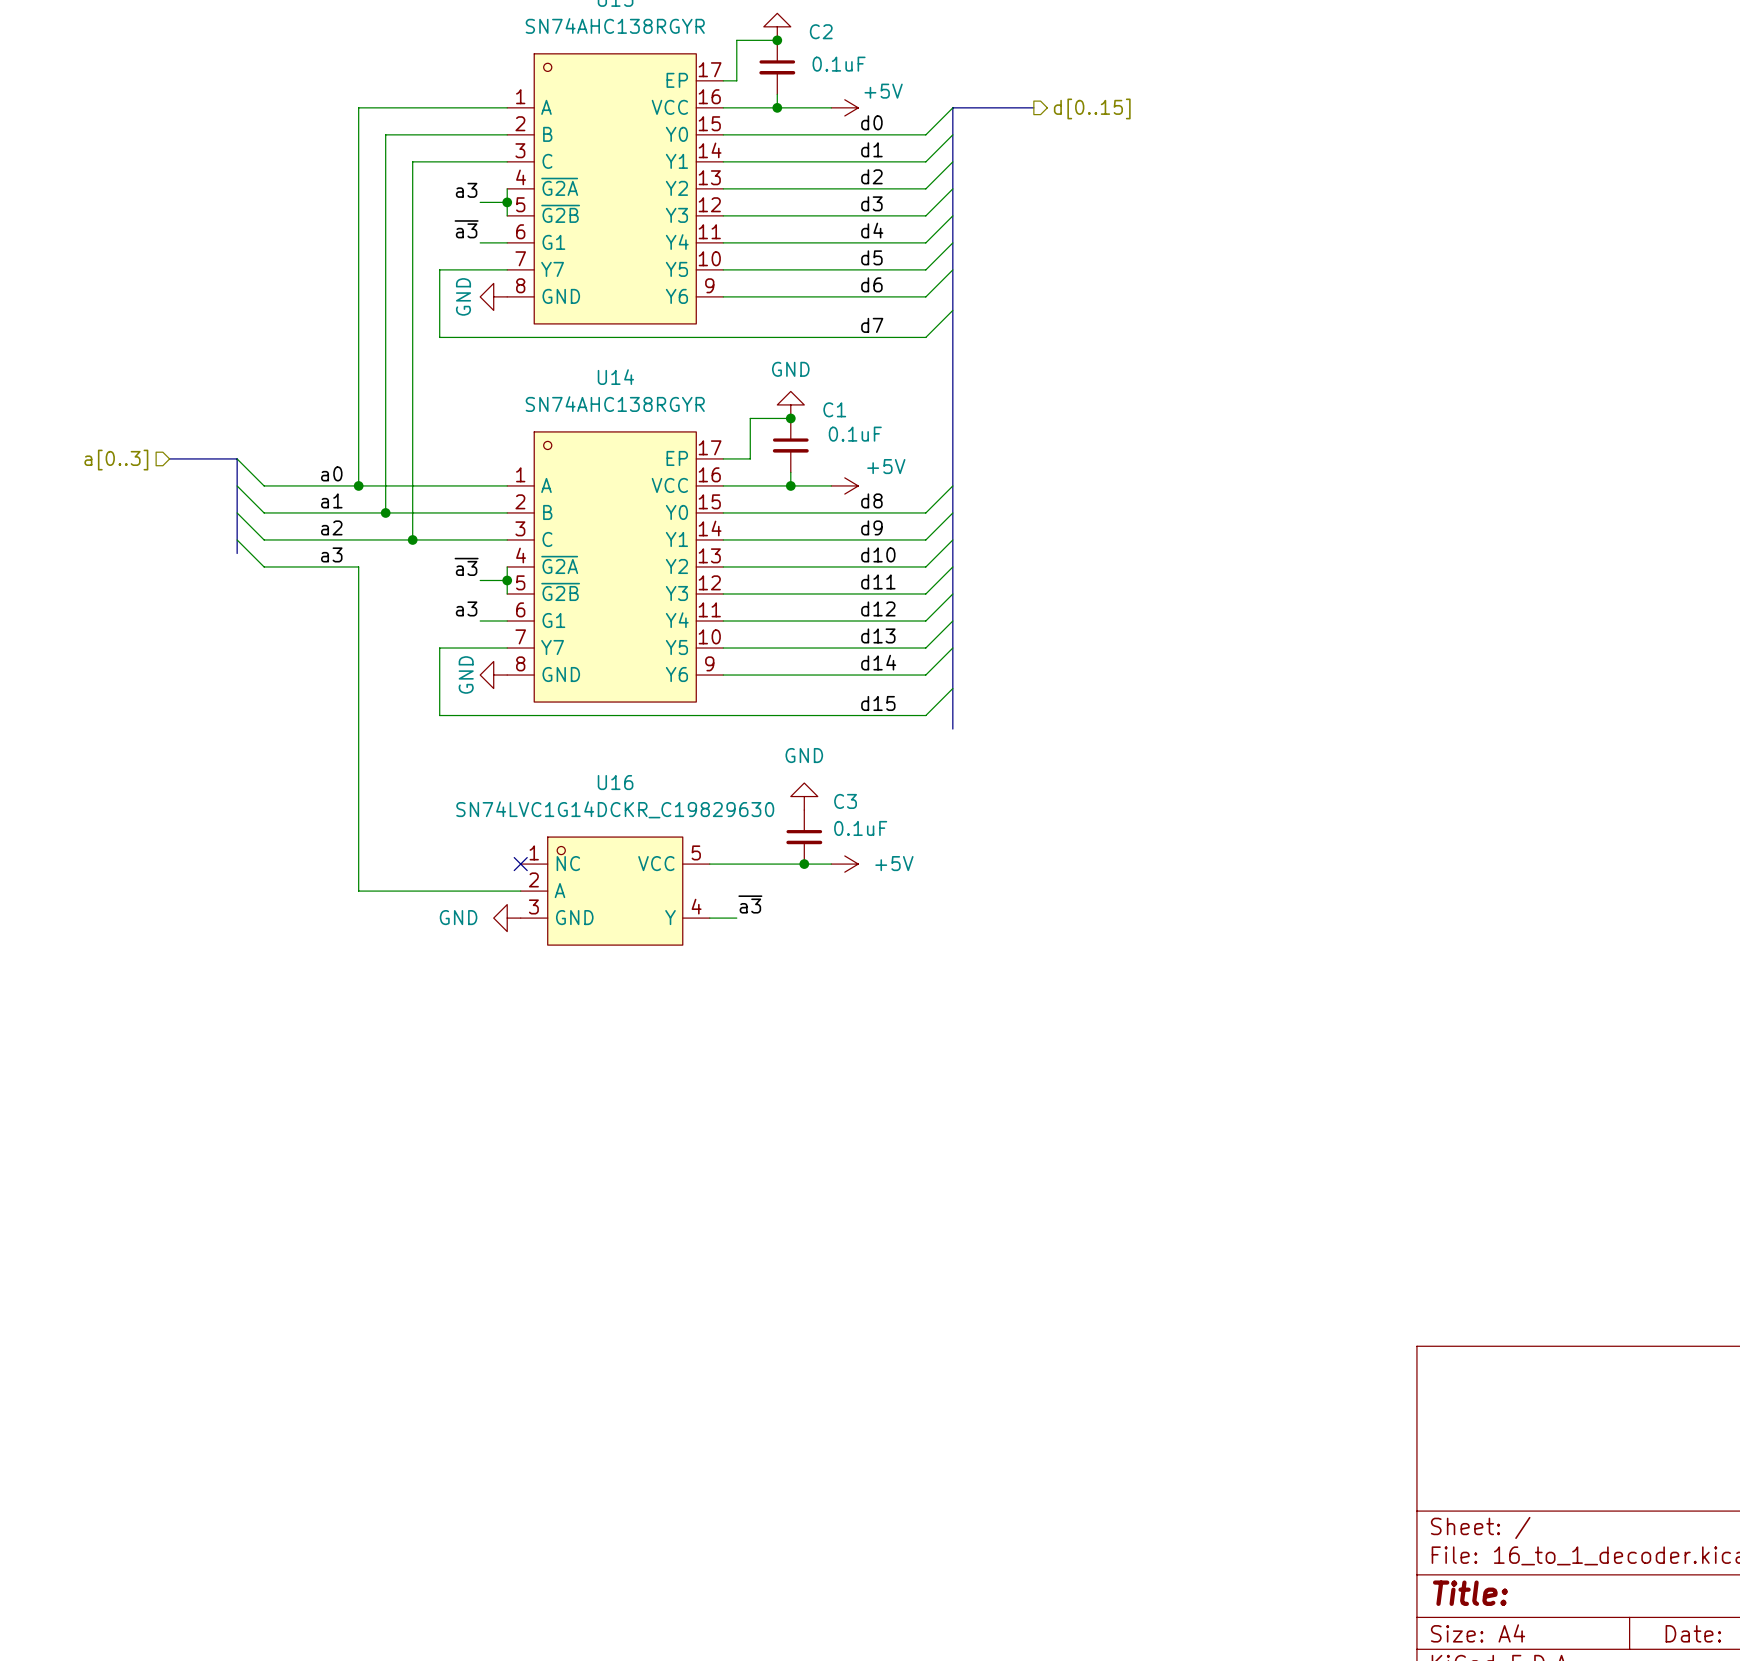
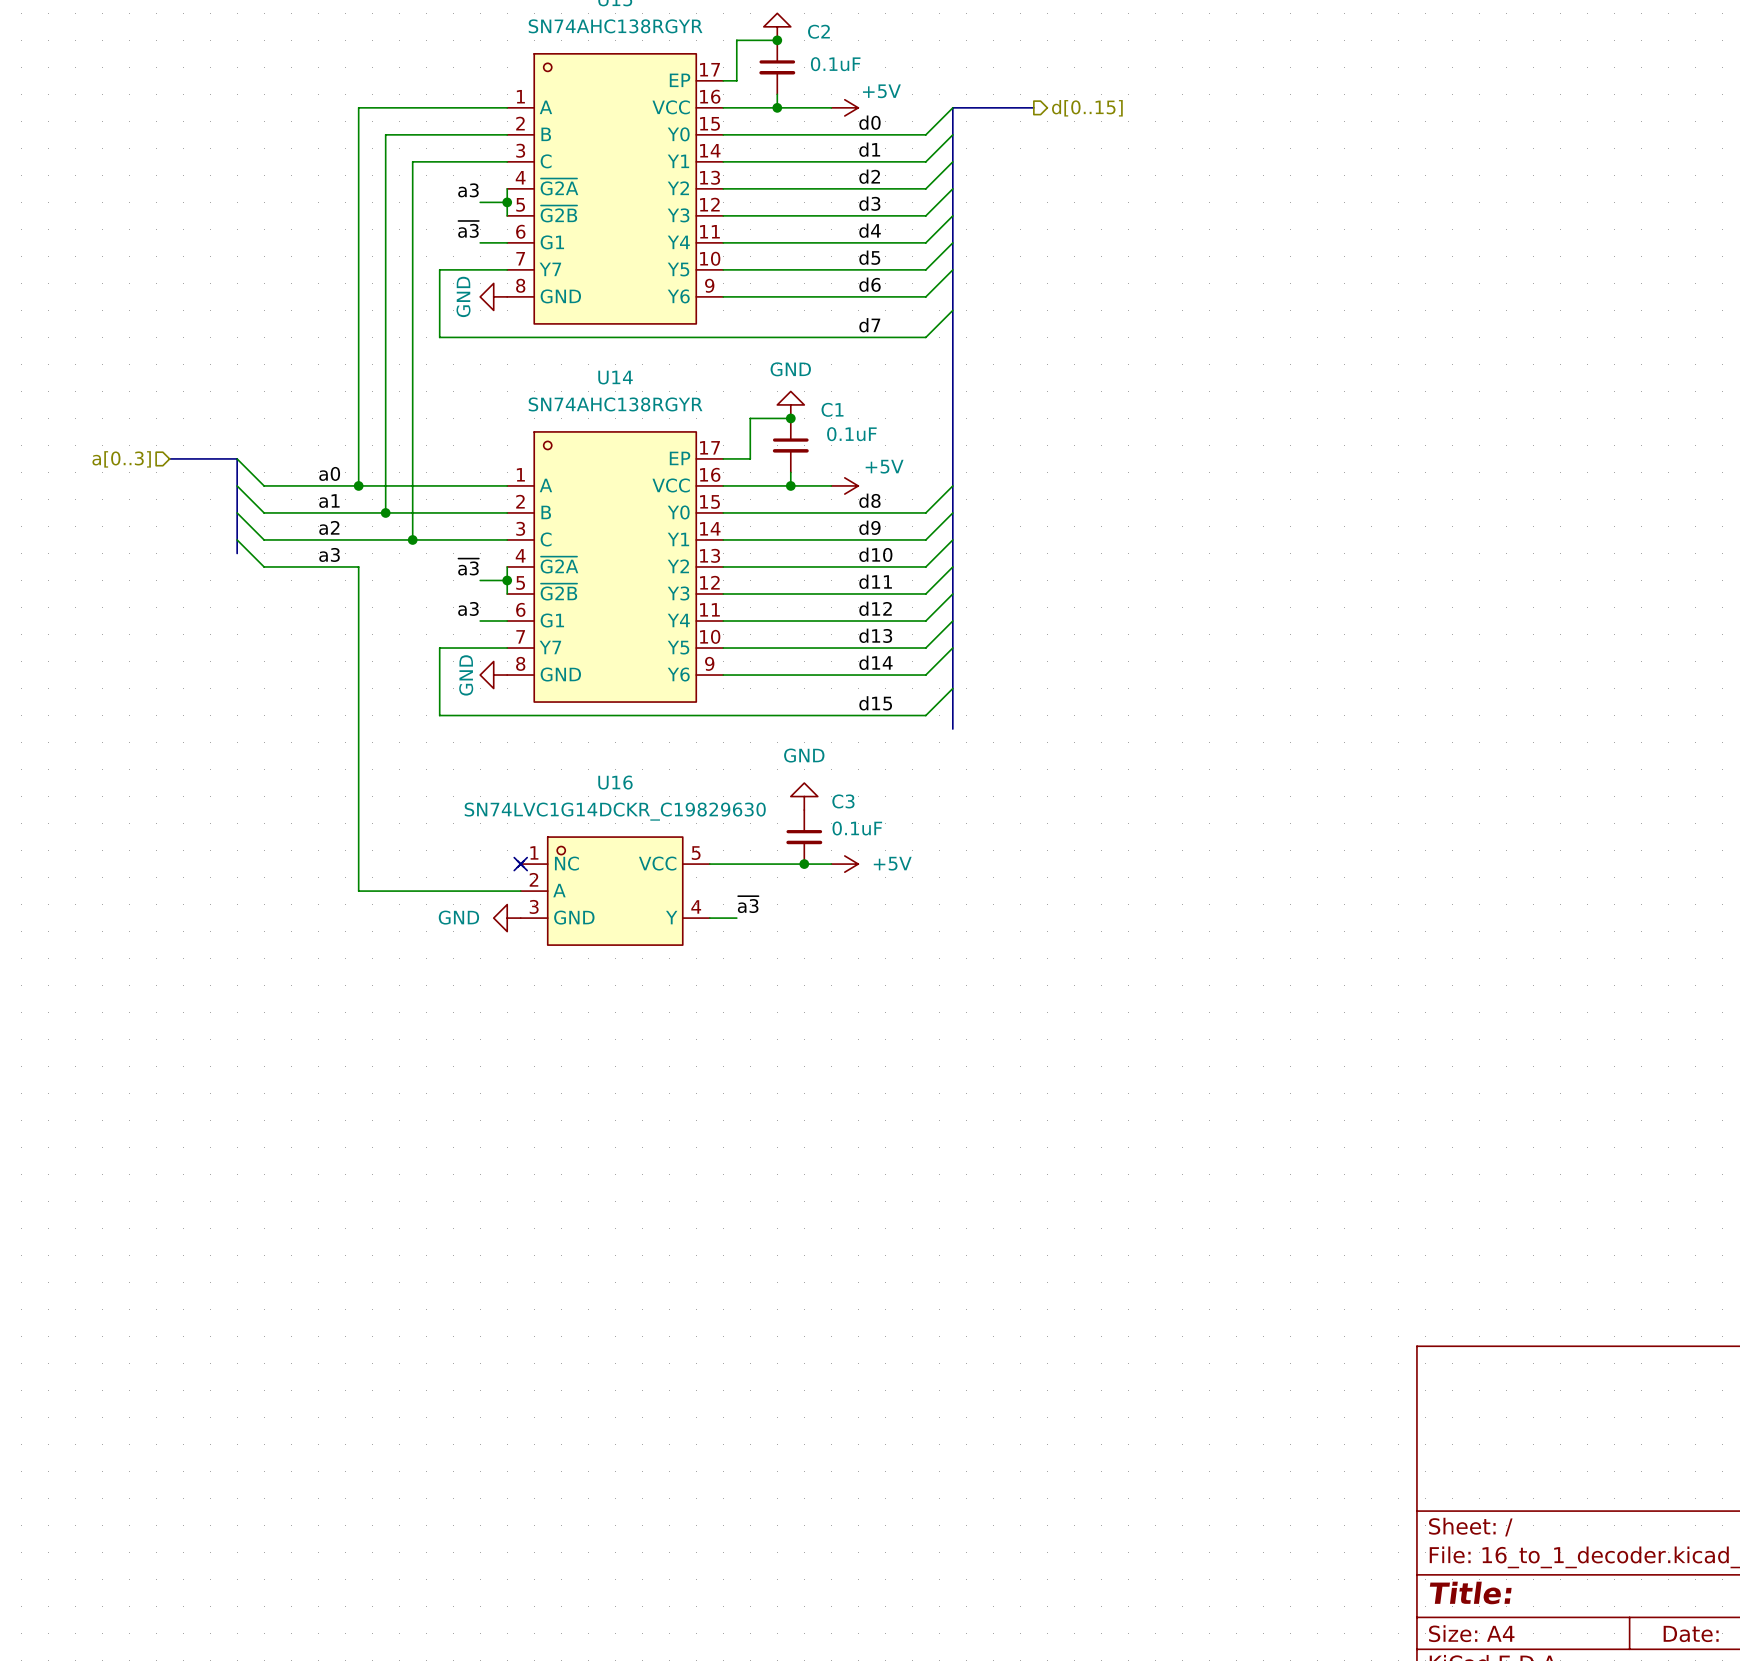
U16 symbol: [520, 837, 710, 946] -> [517, 837, 710, 946]

